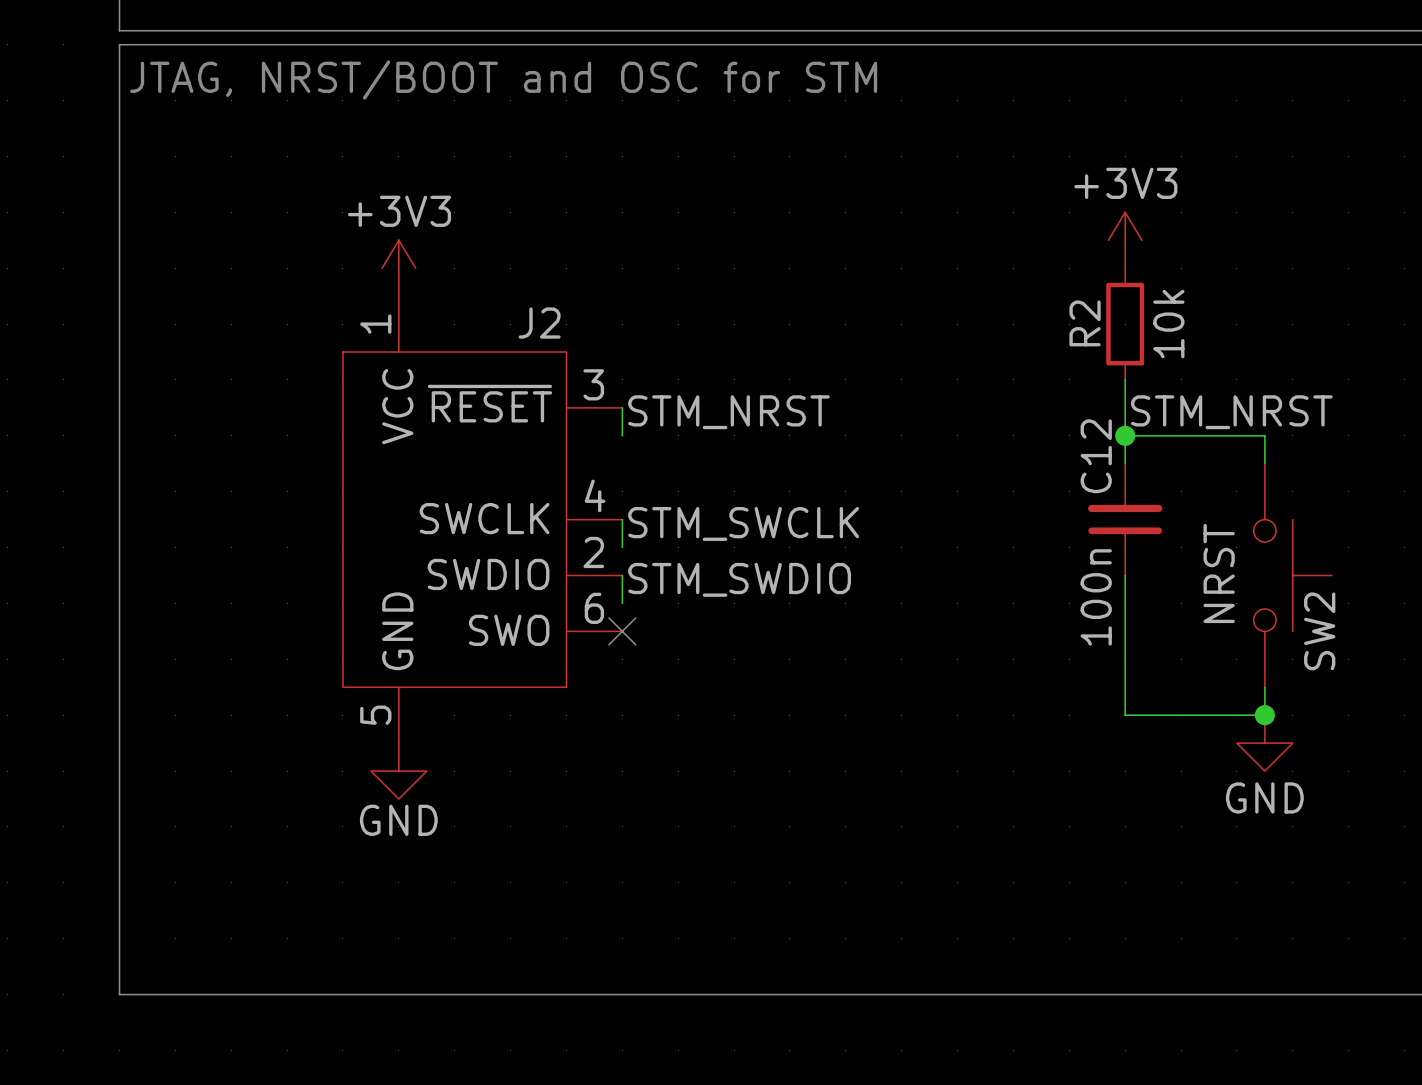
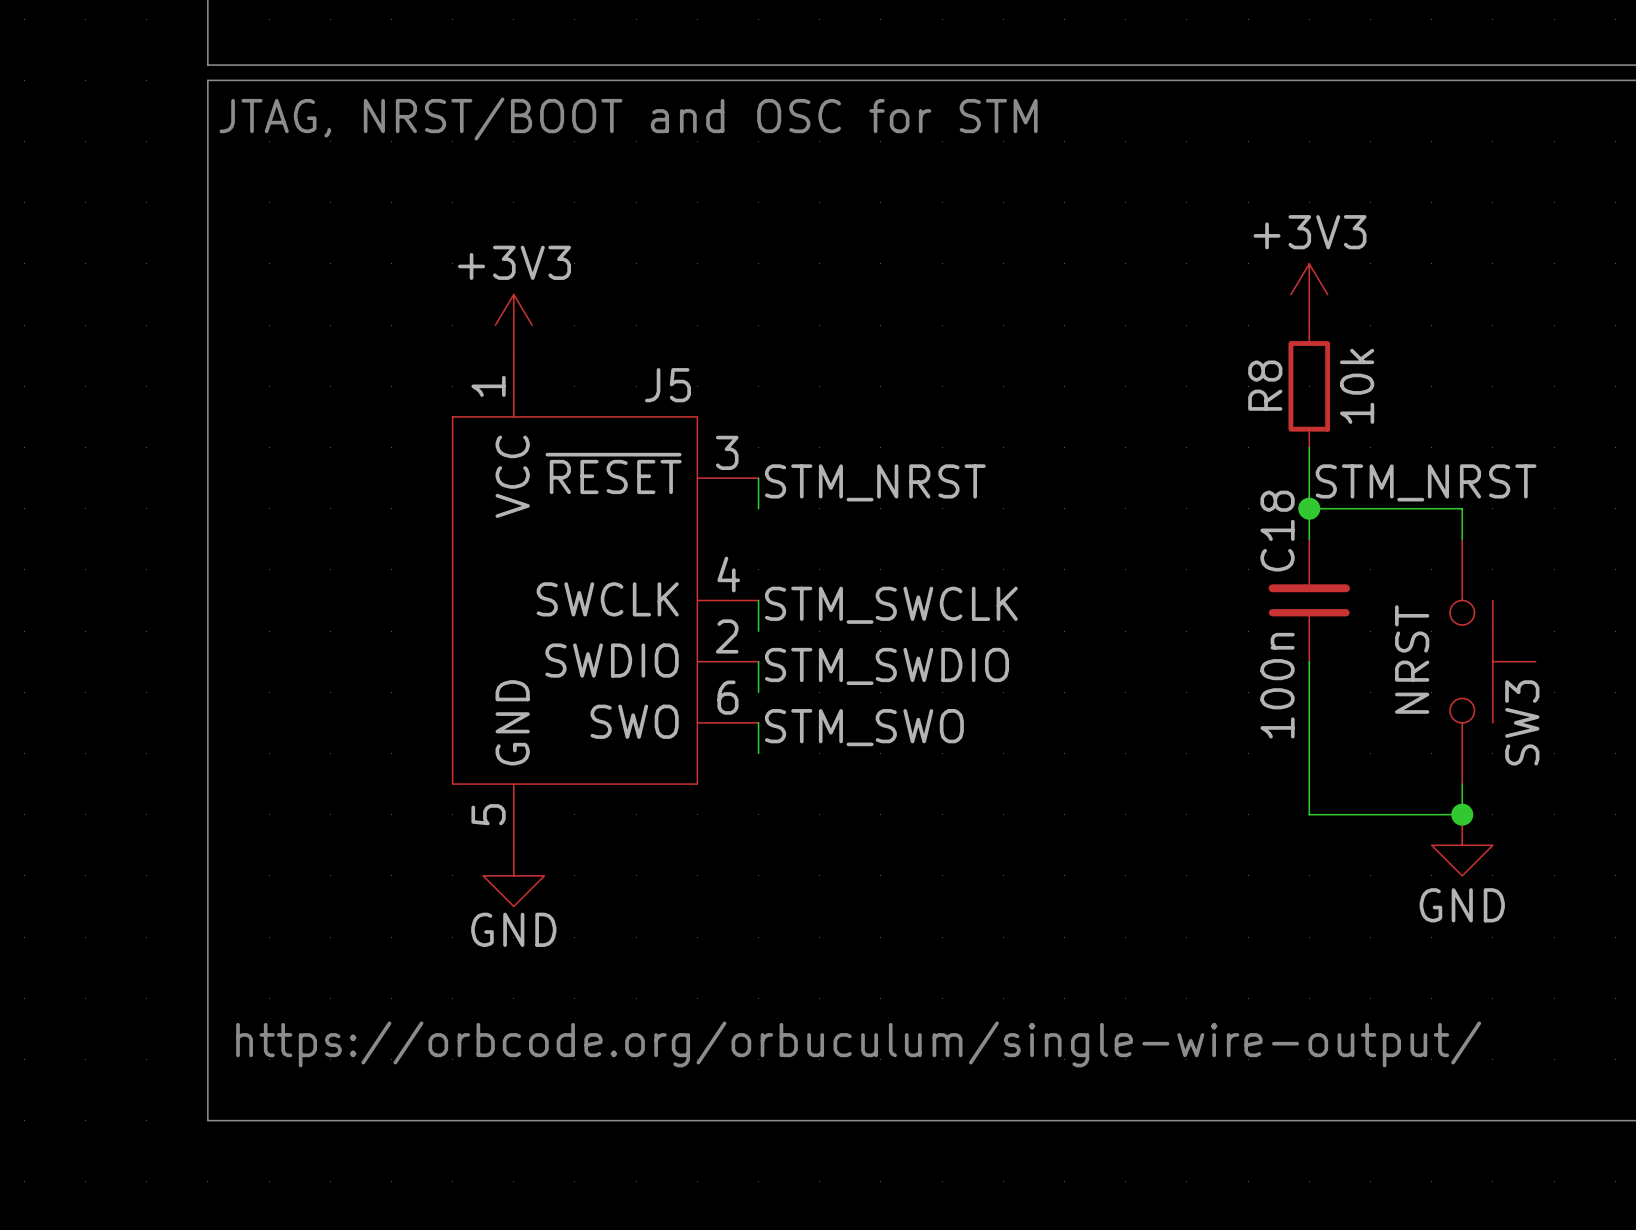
J2 name: J2 (539, 323) -> J5 (668, 385)
R2 name: R2 (1085, 323) -> R8 (1265, 385)
C12 name: C12 (1096, 456) -> C18 (1277, 531)
wire: none -> (758, 722) (758, 753)
no-connect mark: (622, 631) -> none
SW2 name: SW2 (1319, 631) -> SW3 (1522, 722)
label: none -> STM_SWO (864, 727)
text: none -> https://orbcode.org/orbuculum/single-wire-output/ (858, 1044)

